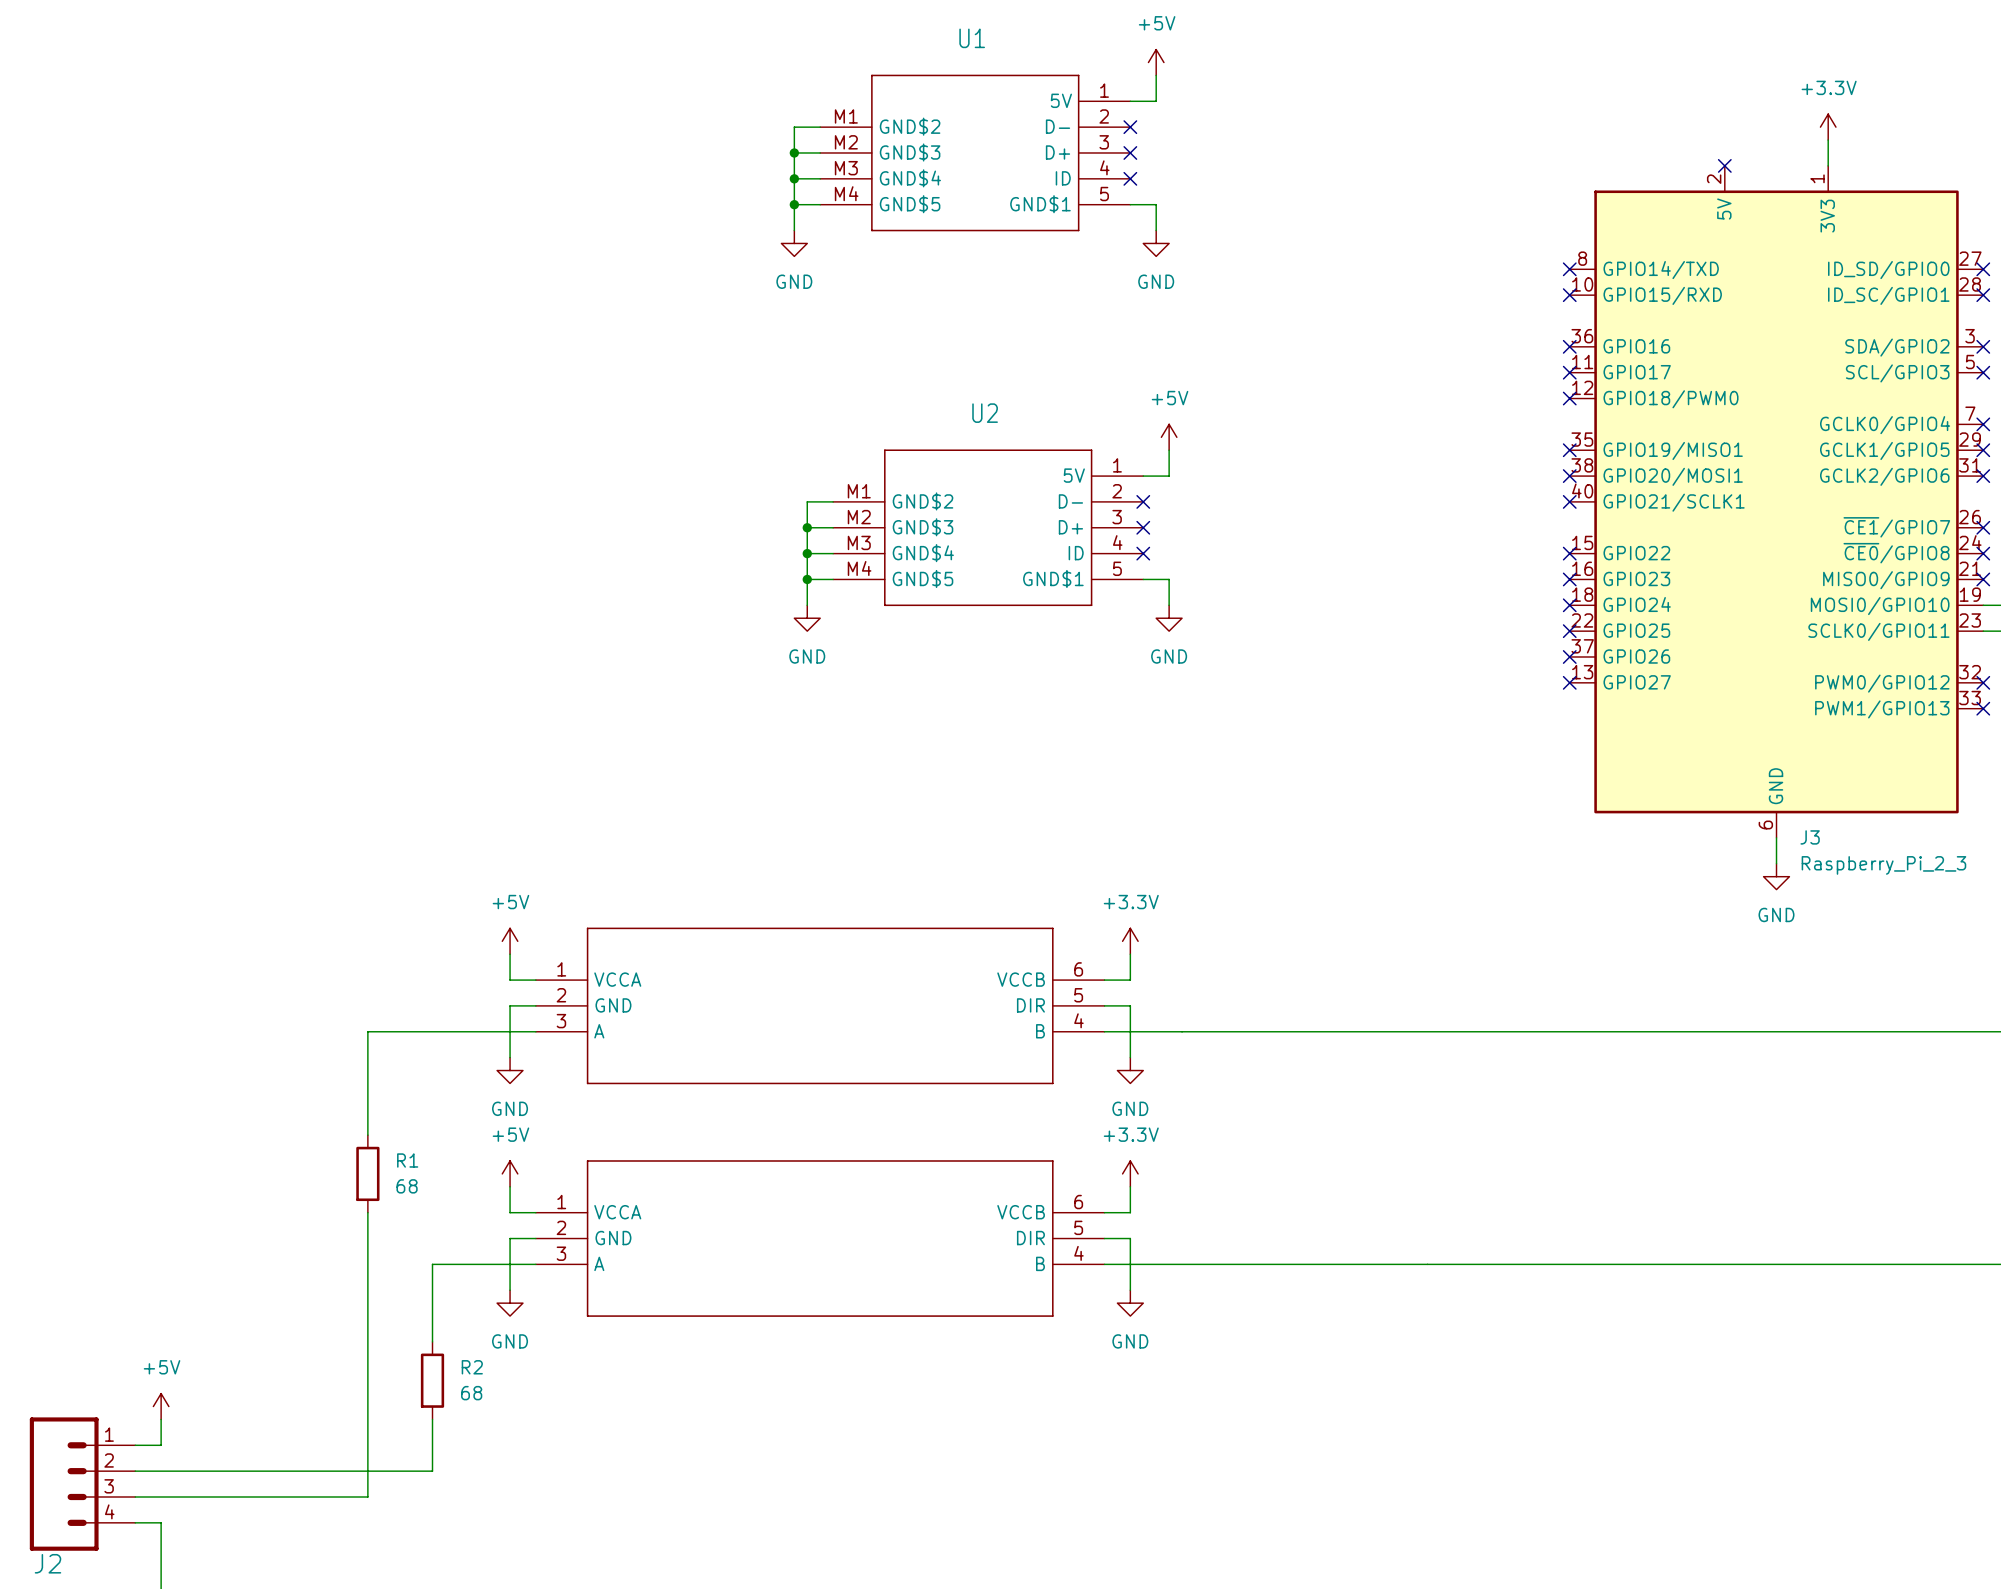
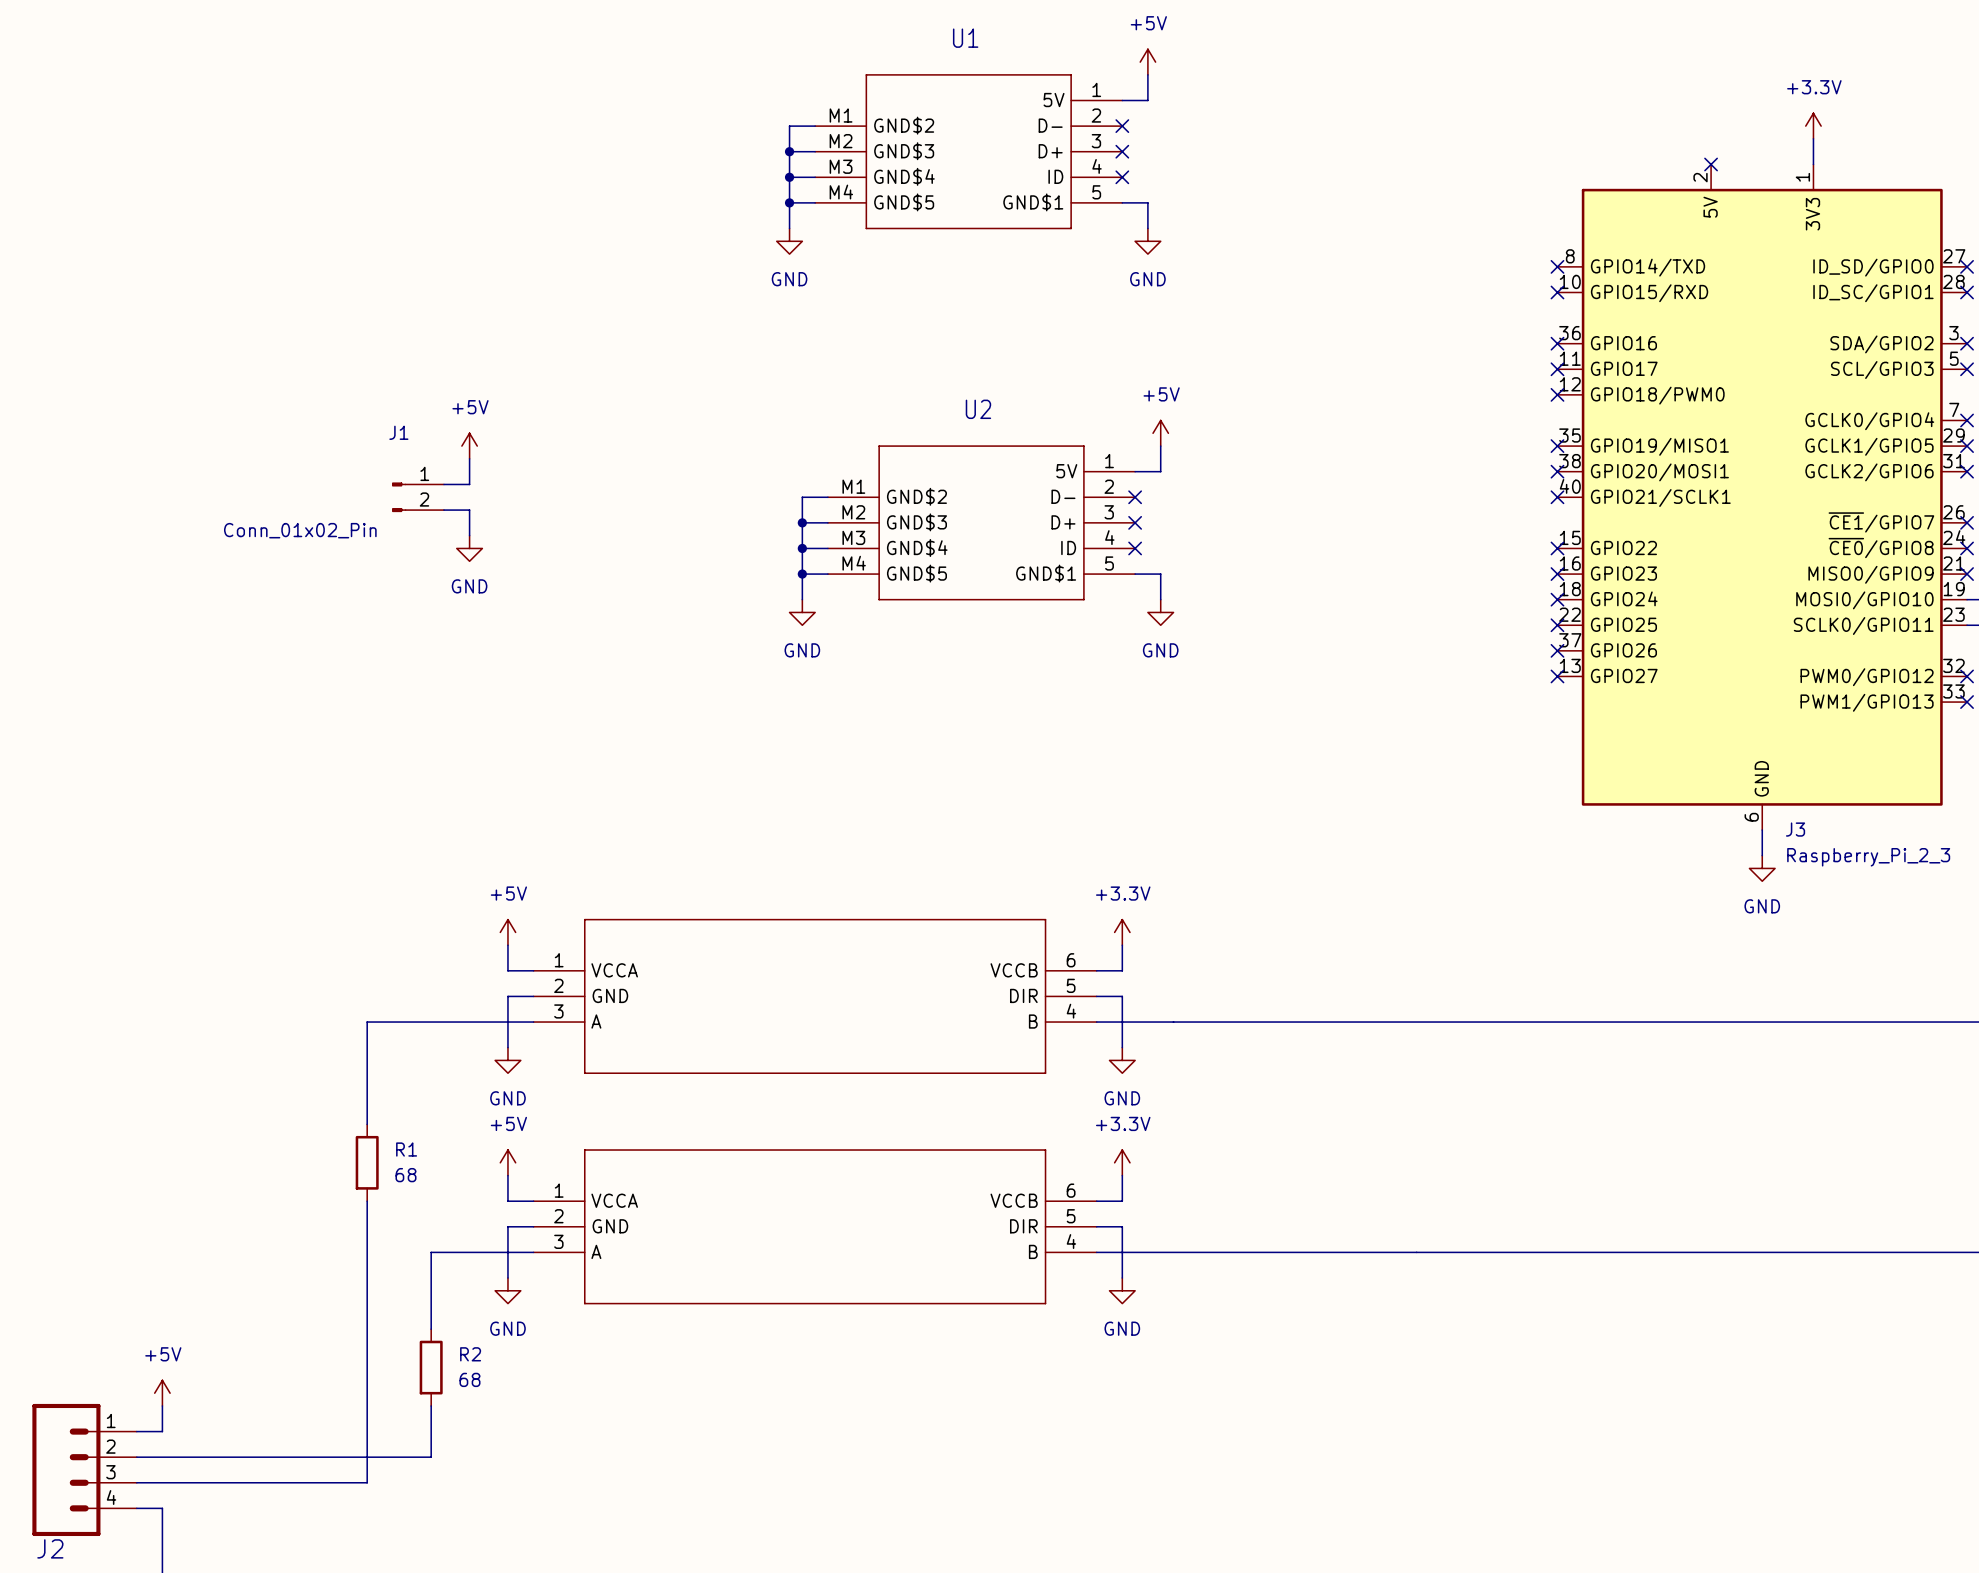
power symbol: none -> +5V (469, 446)
wire: none -> (469, 458) (469, 484) (443, 484)
J1: none -> Conn_01x02_Pin (418, 497)
wire: none -> (443, 510) (469, 510) (469, 535)
power symbol: none -> GND (469, 548)

